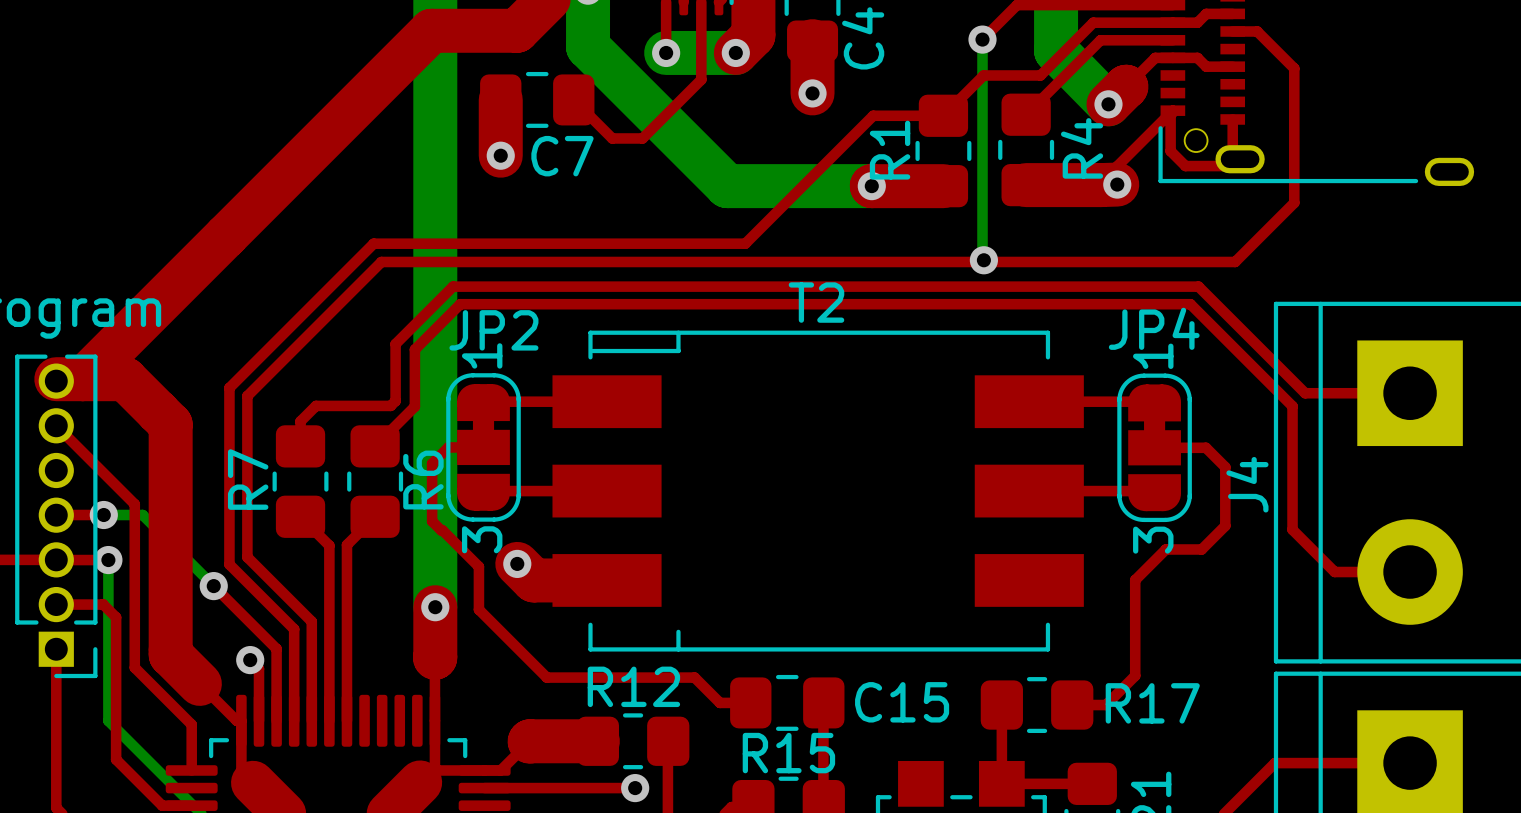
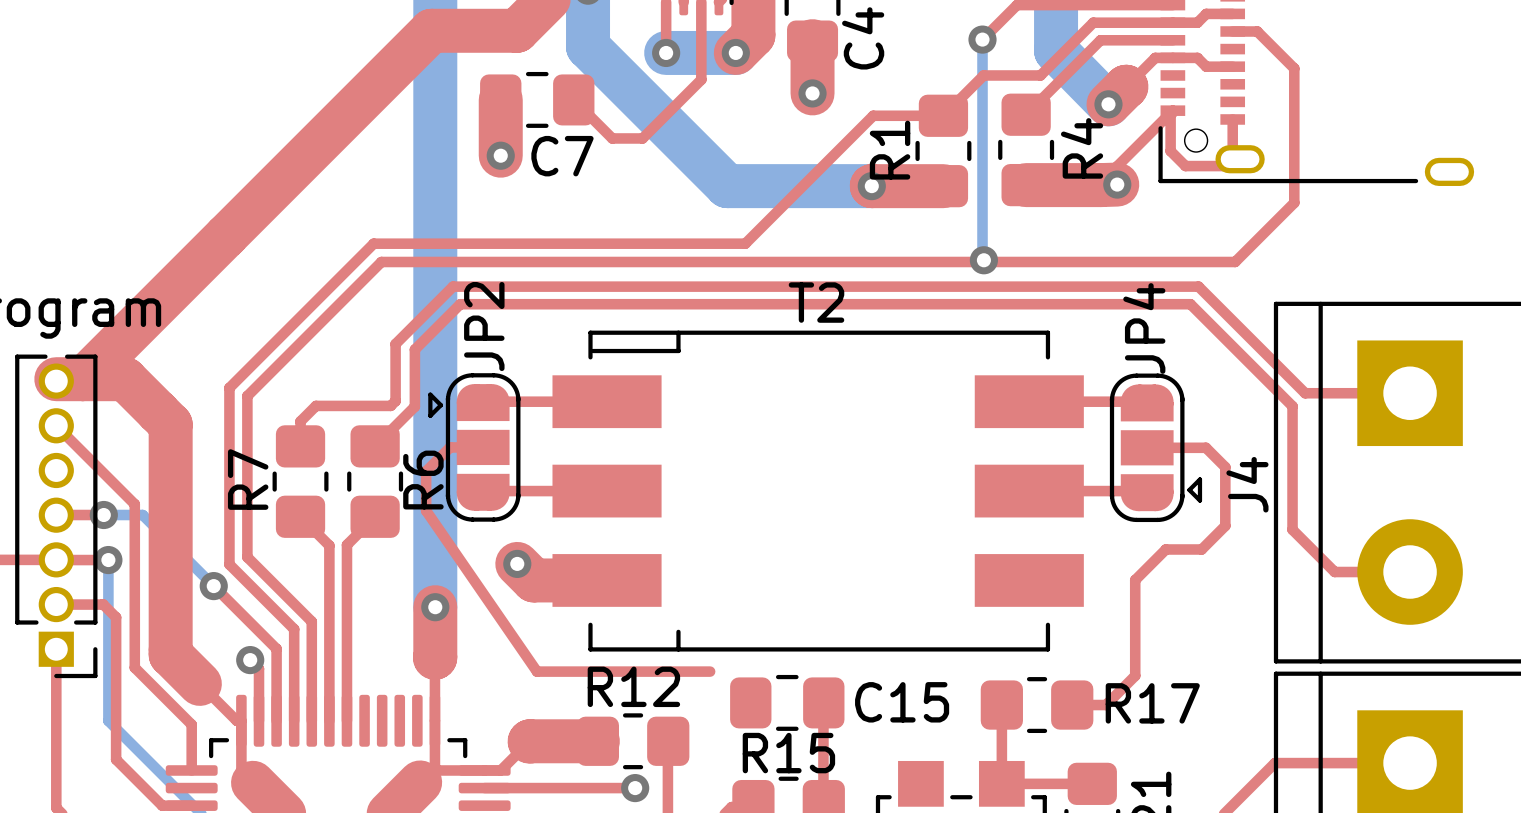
JP2 footprint: [446, 373, 521, 522] -> [428, 373, 521, 522]
JP4 footprint: [1117, 373, 1192, 523] -> [1109, 373, 1203, 523]
top track: (450, 447) (432, 463) (432, 521) (478, 566) (478, 609) (546, 677) (694, 677) (719, 702) (750, 702) -> (450, 447) (426, 471) (426, 510) (537, 671) (710, 671)

